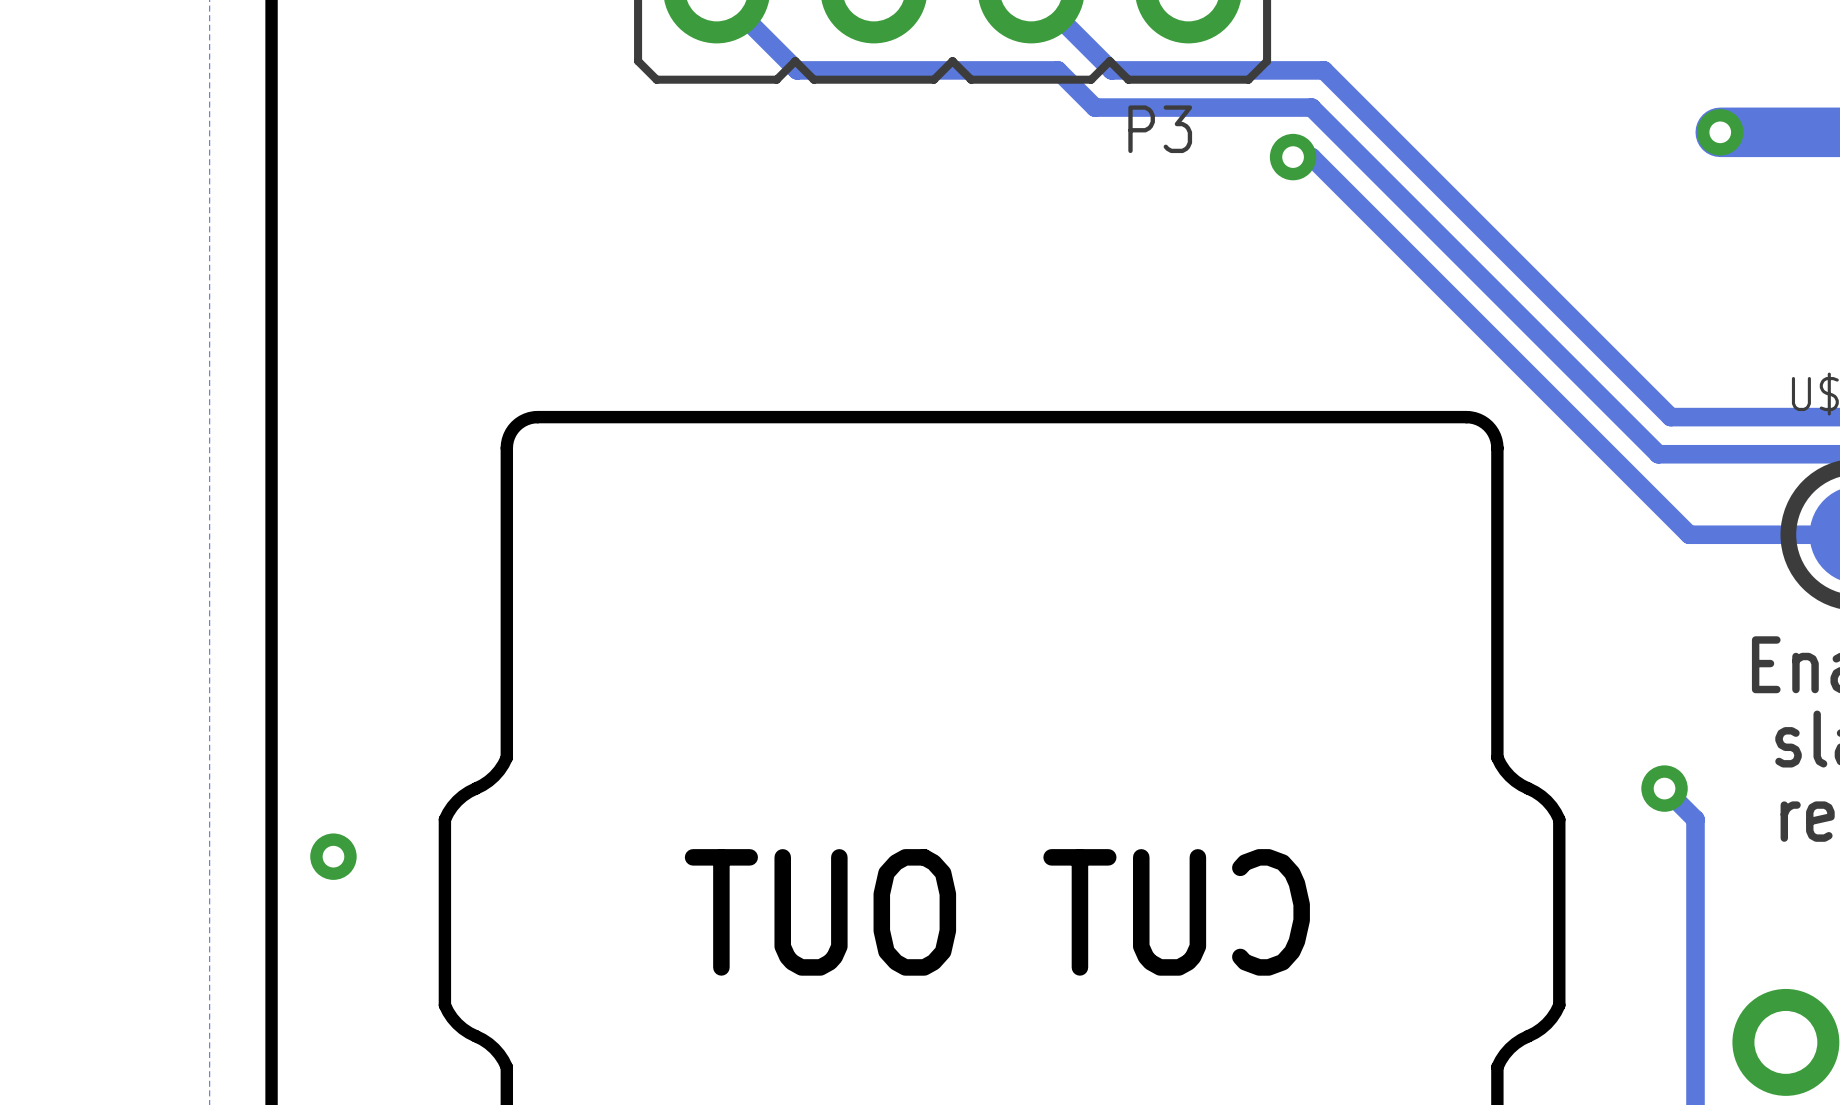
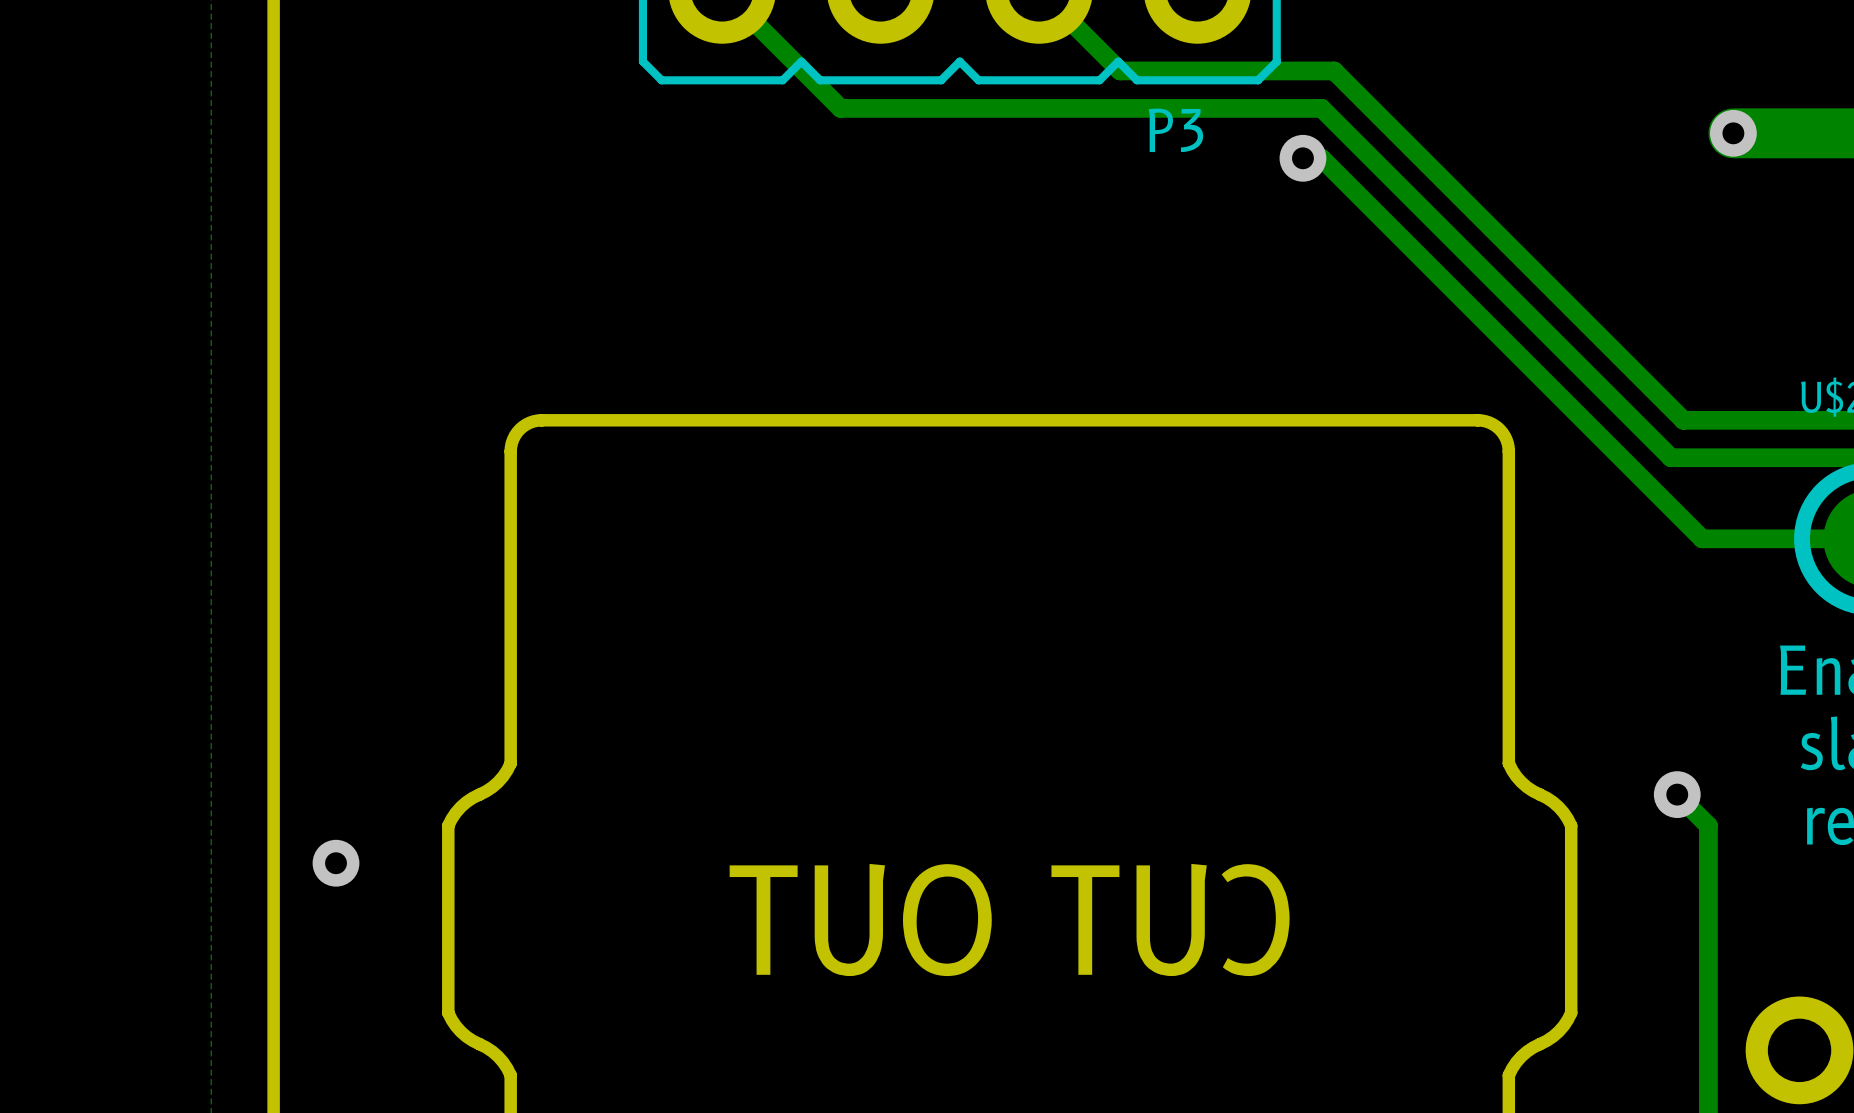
track: (797, 70) (1057, 70) (1094, 107) -> (803, 70) (840, 108) (1103, 108)

